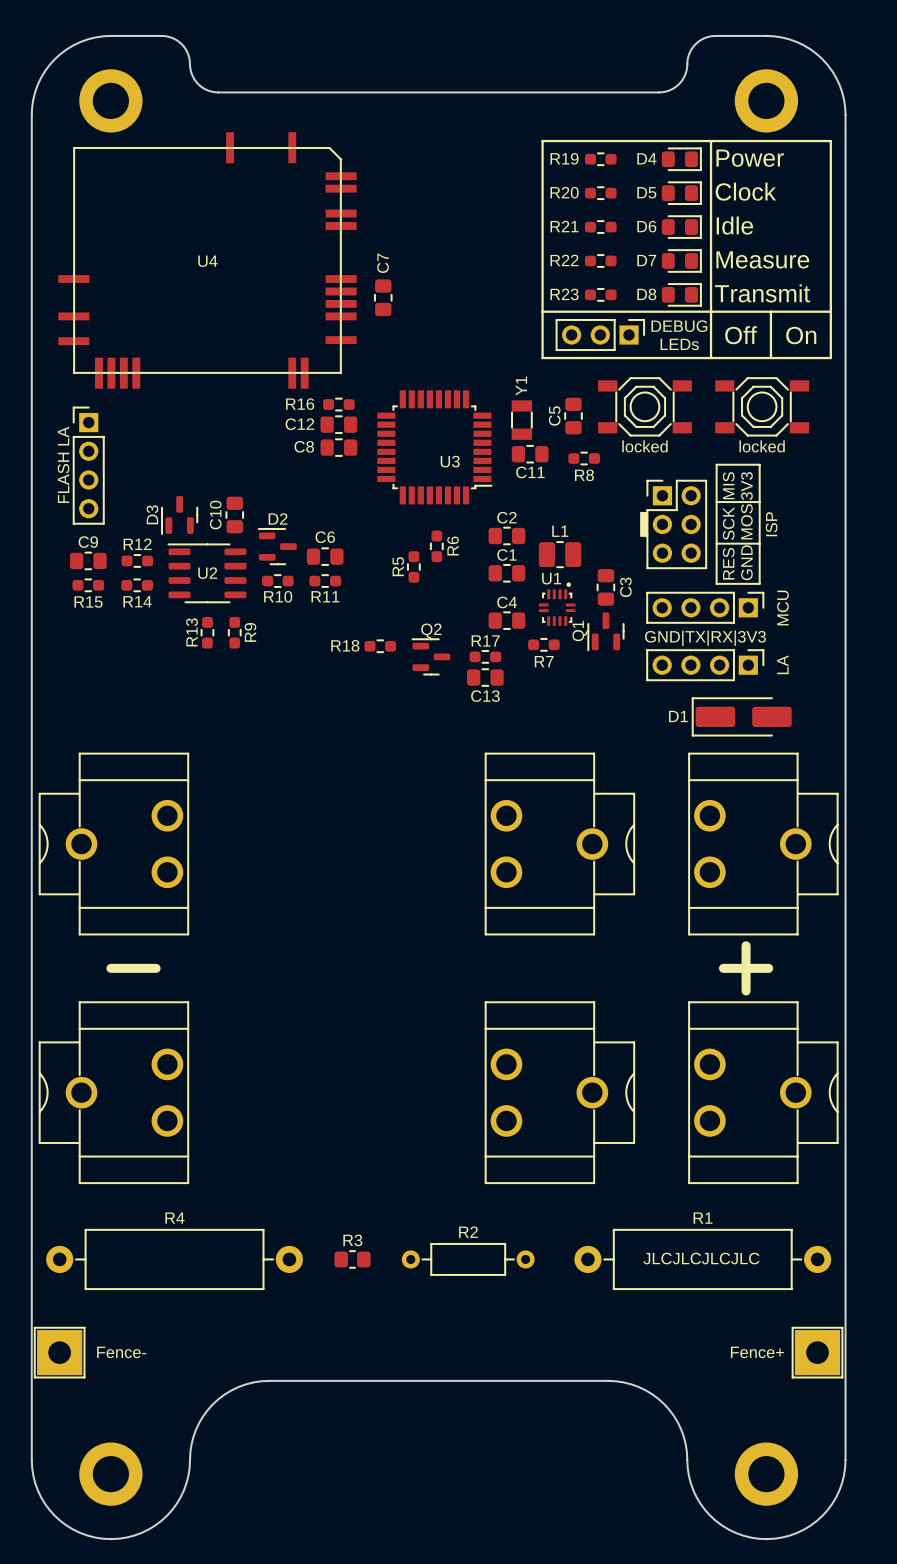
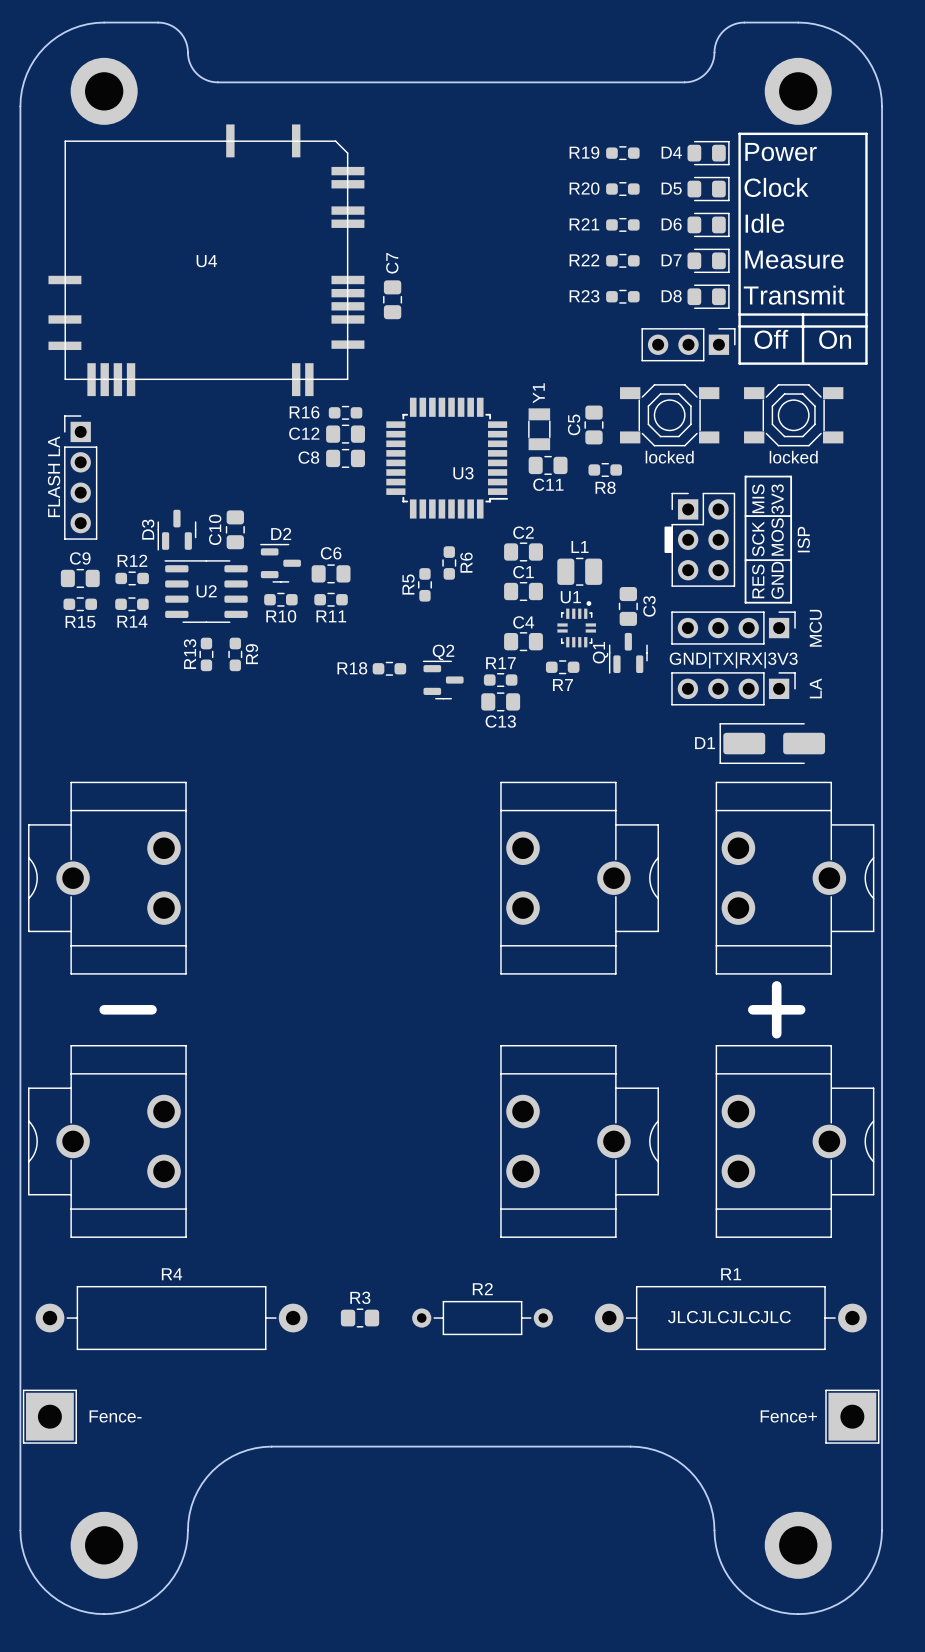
line: (711, 141) (542, 141) (542, 358) (711, 358) -> none
line: (542, 311) (711, 311) -> none
line: none -> (739, 326) (866, 326)
text: DEBUG (679, 326) -> none
part position: (600, 335) -> (688, 344)
text: LEDs (679, 344) -> none

